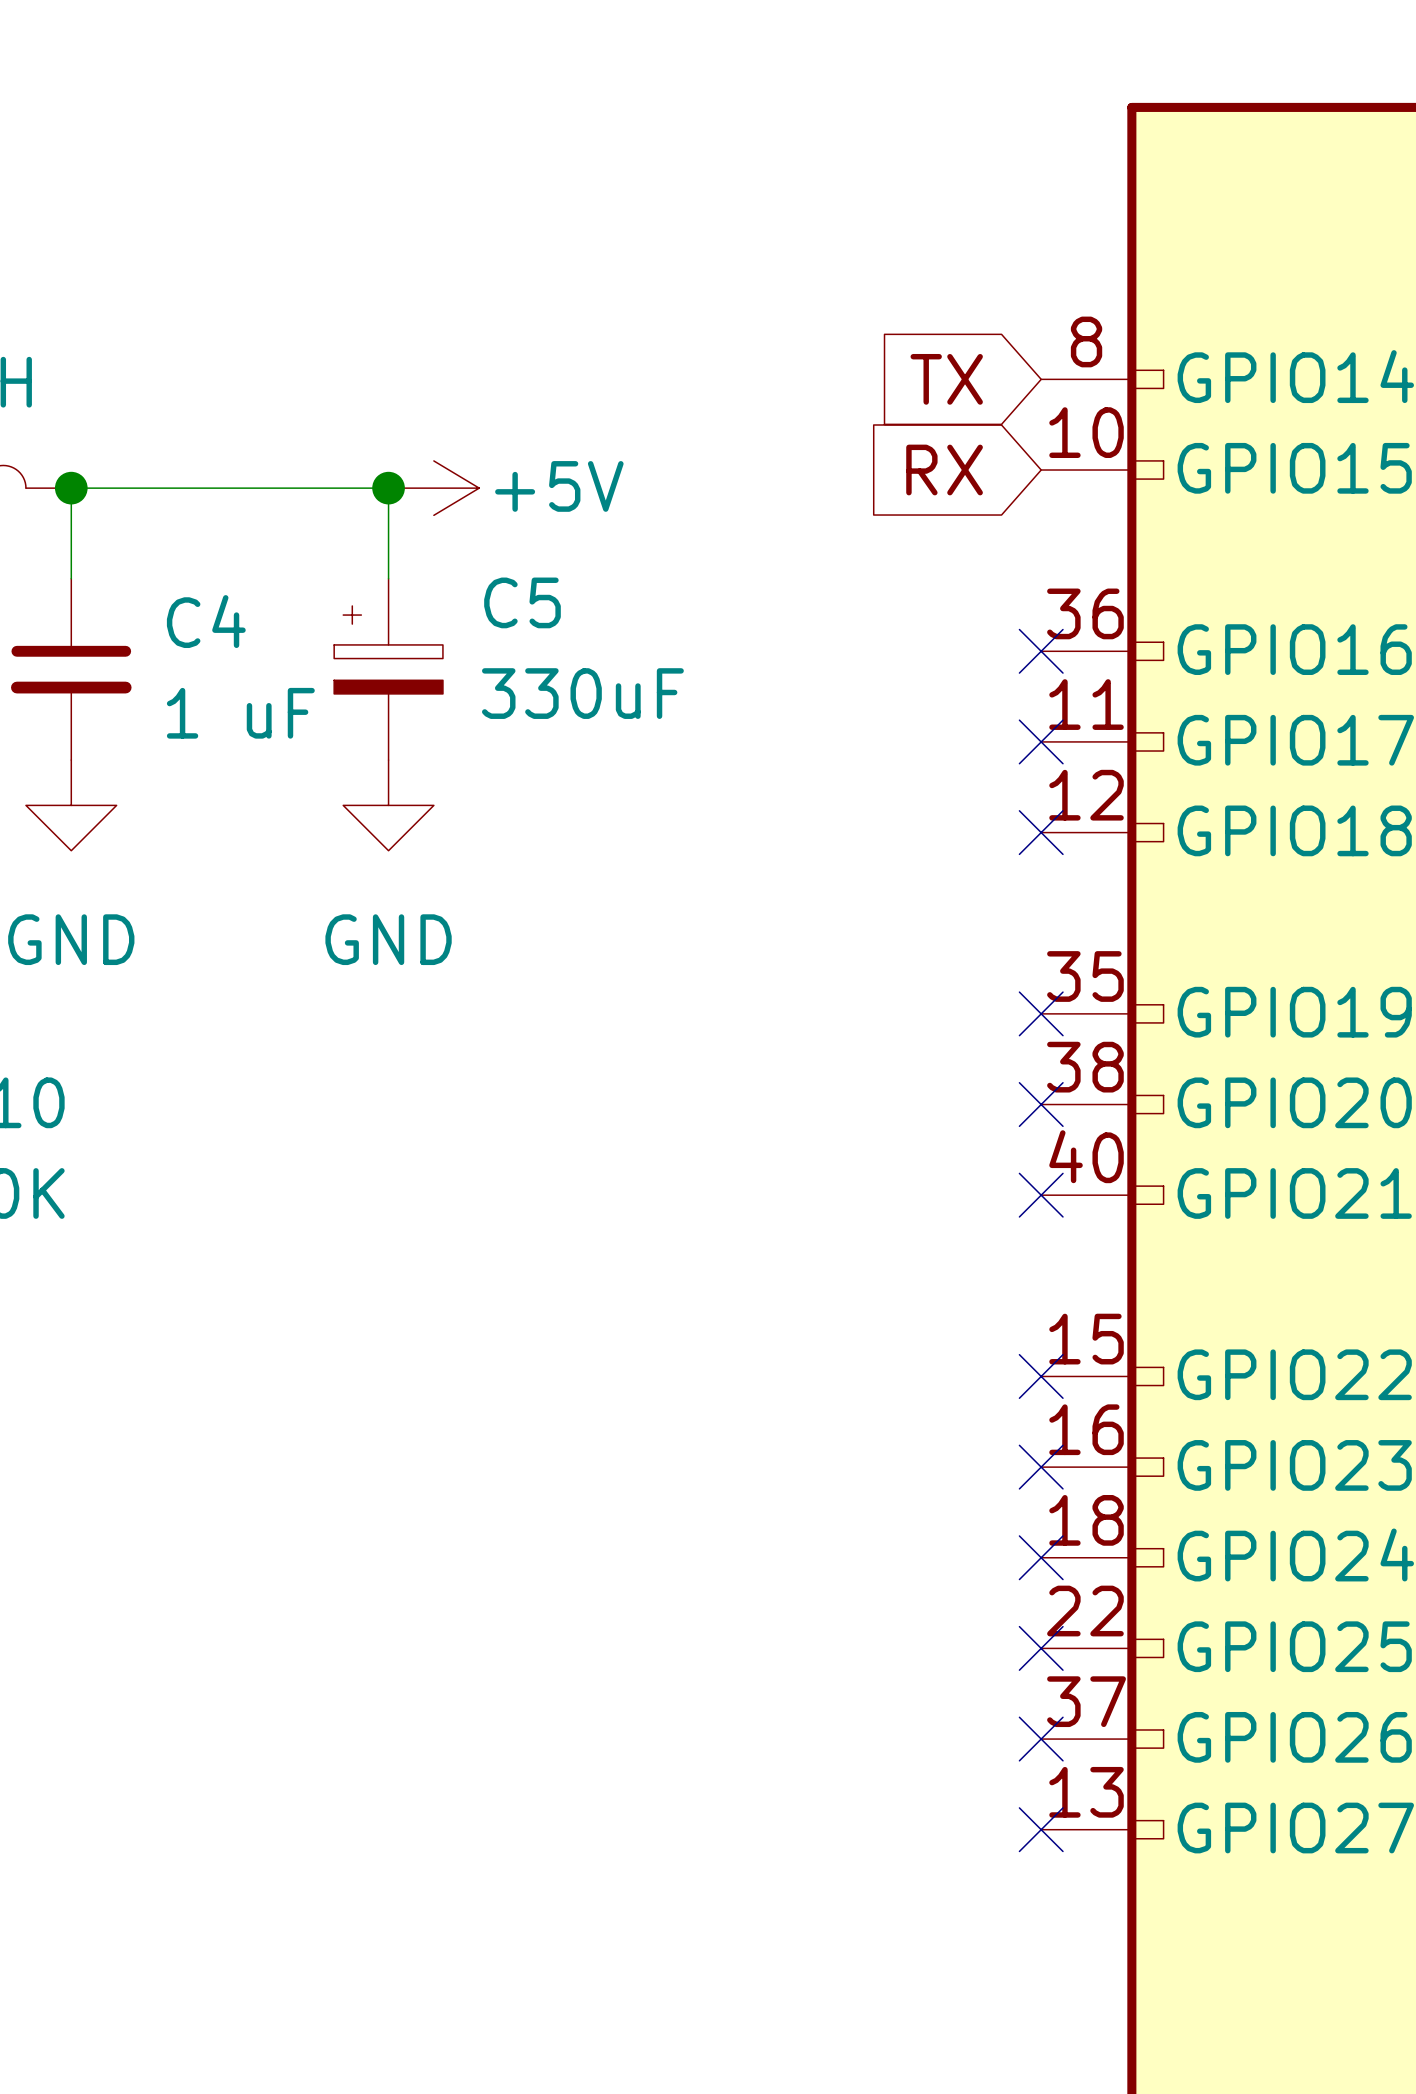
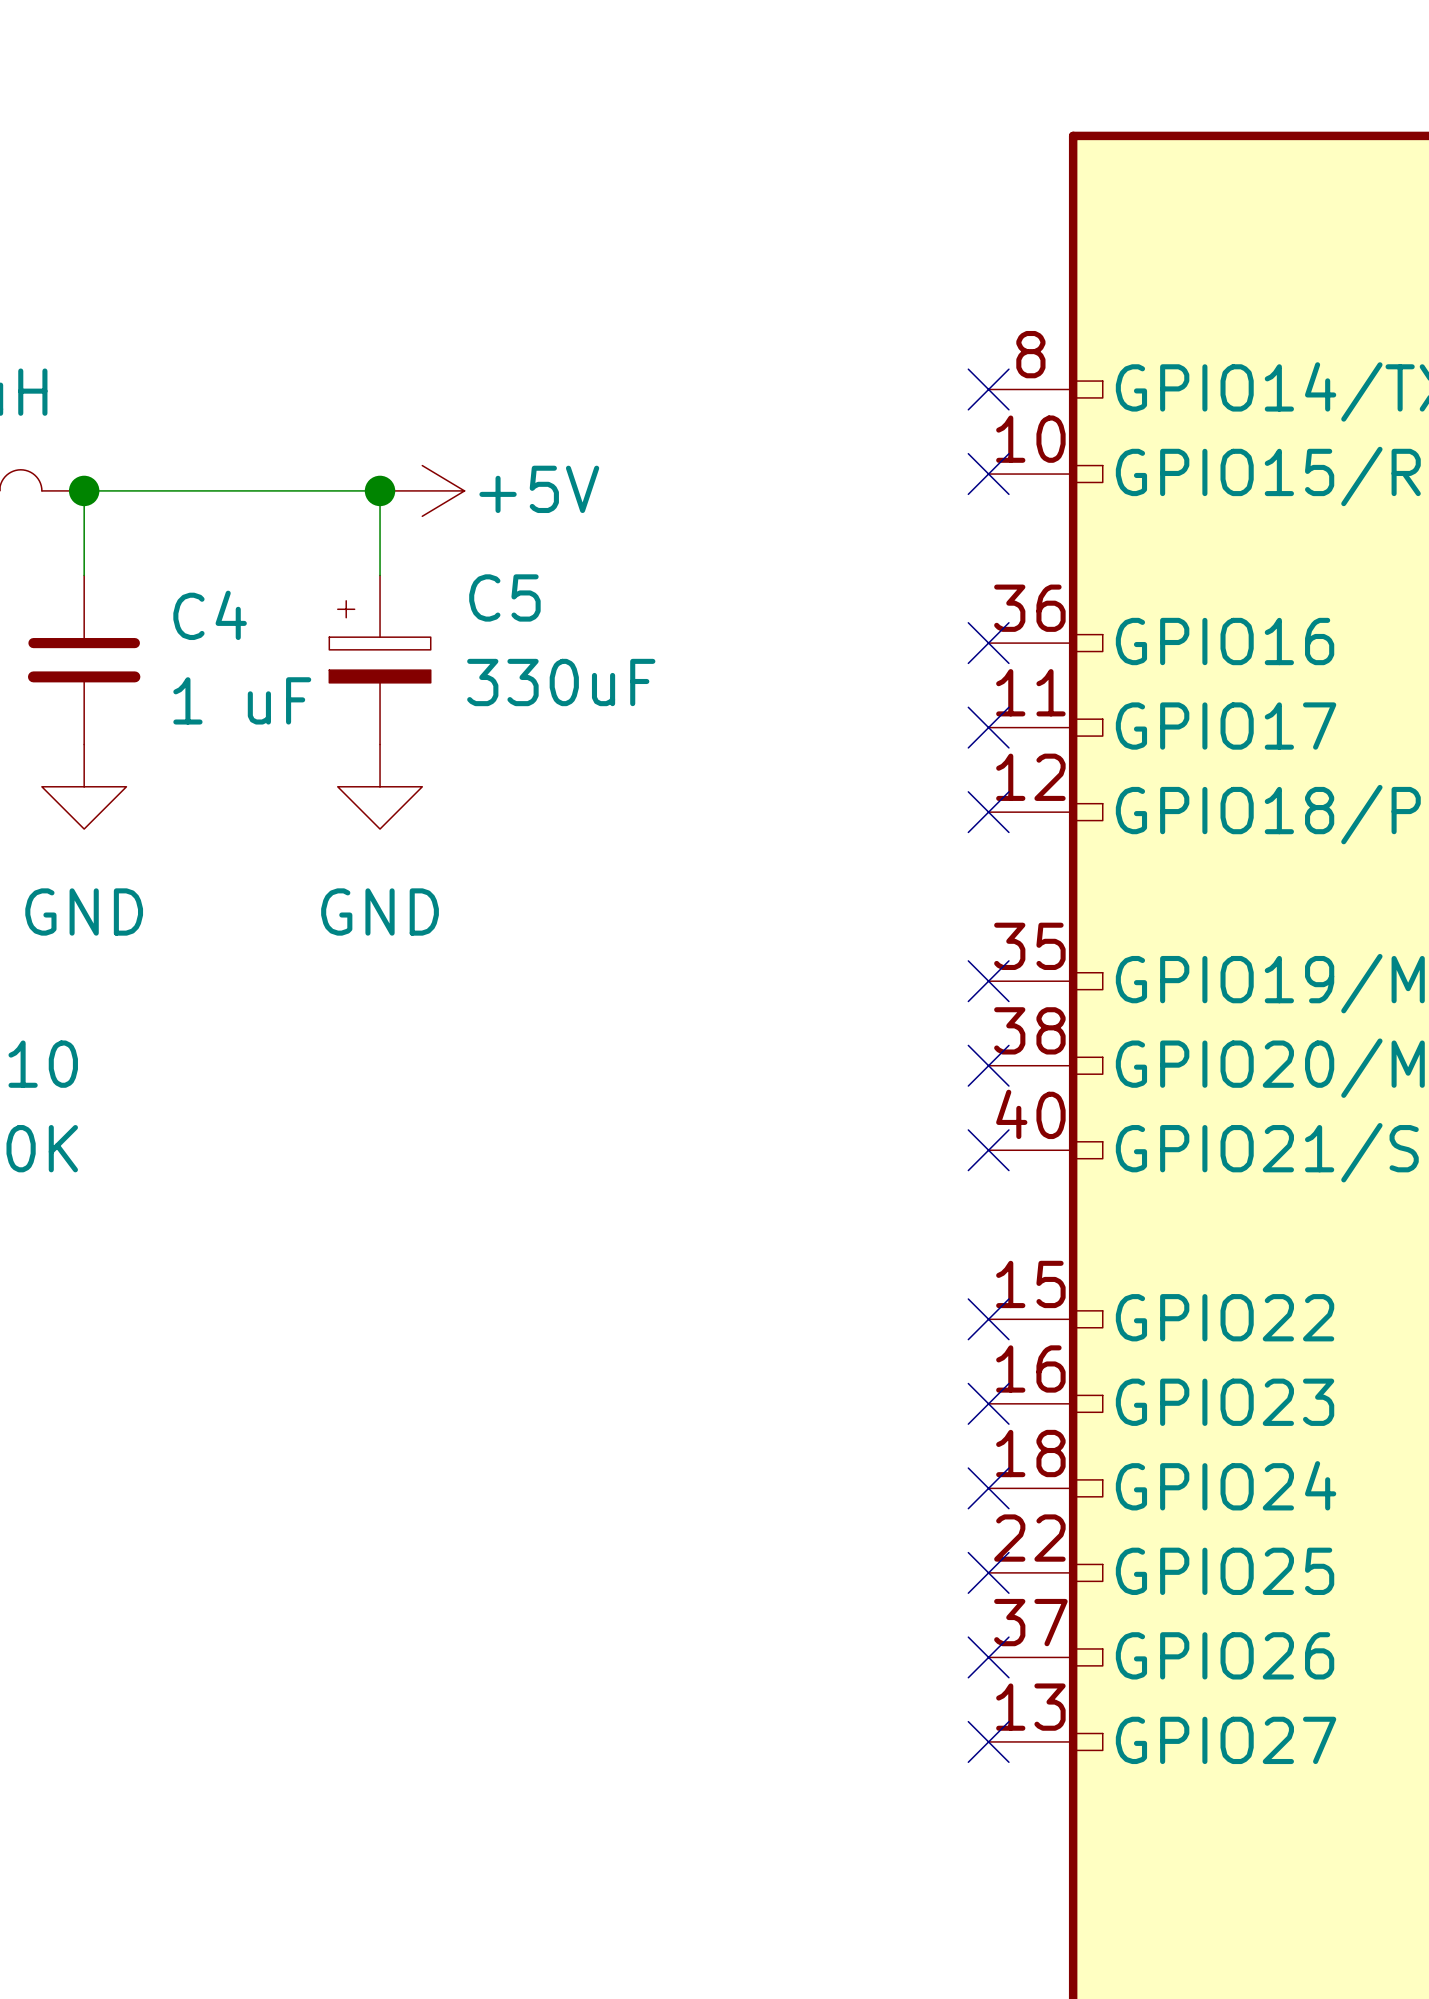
global label: TX (946, 379) -> none
no-connect mark: none -> (988, 389)
global label: RX (944, 470) -> none
no-connect mark: none -> (988, 474)

